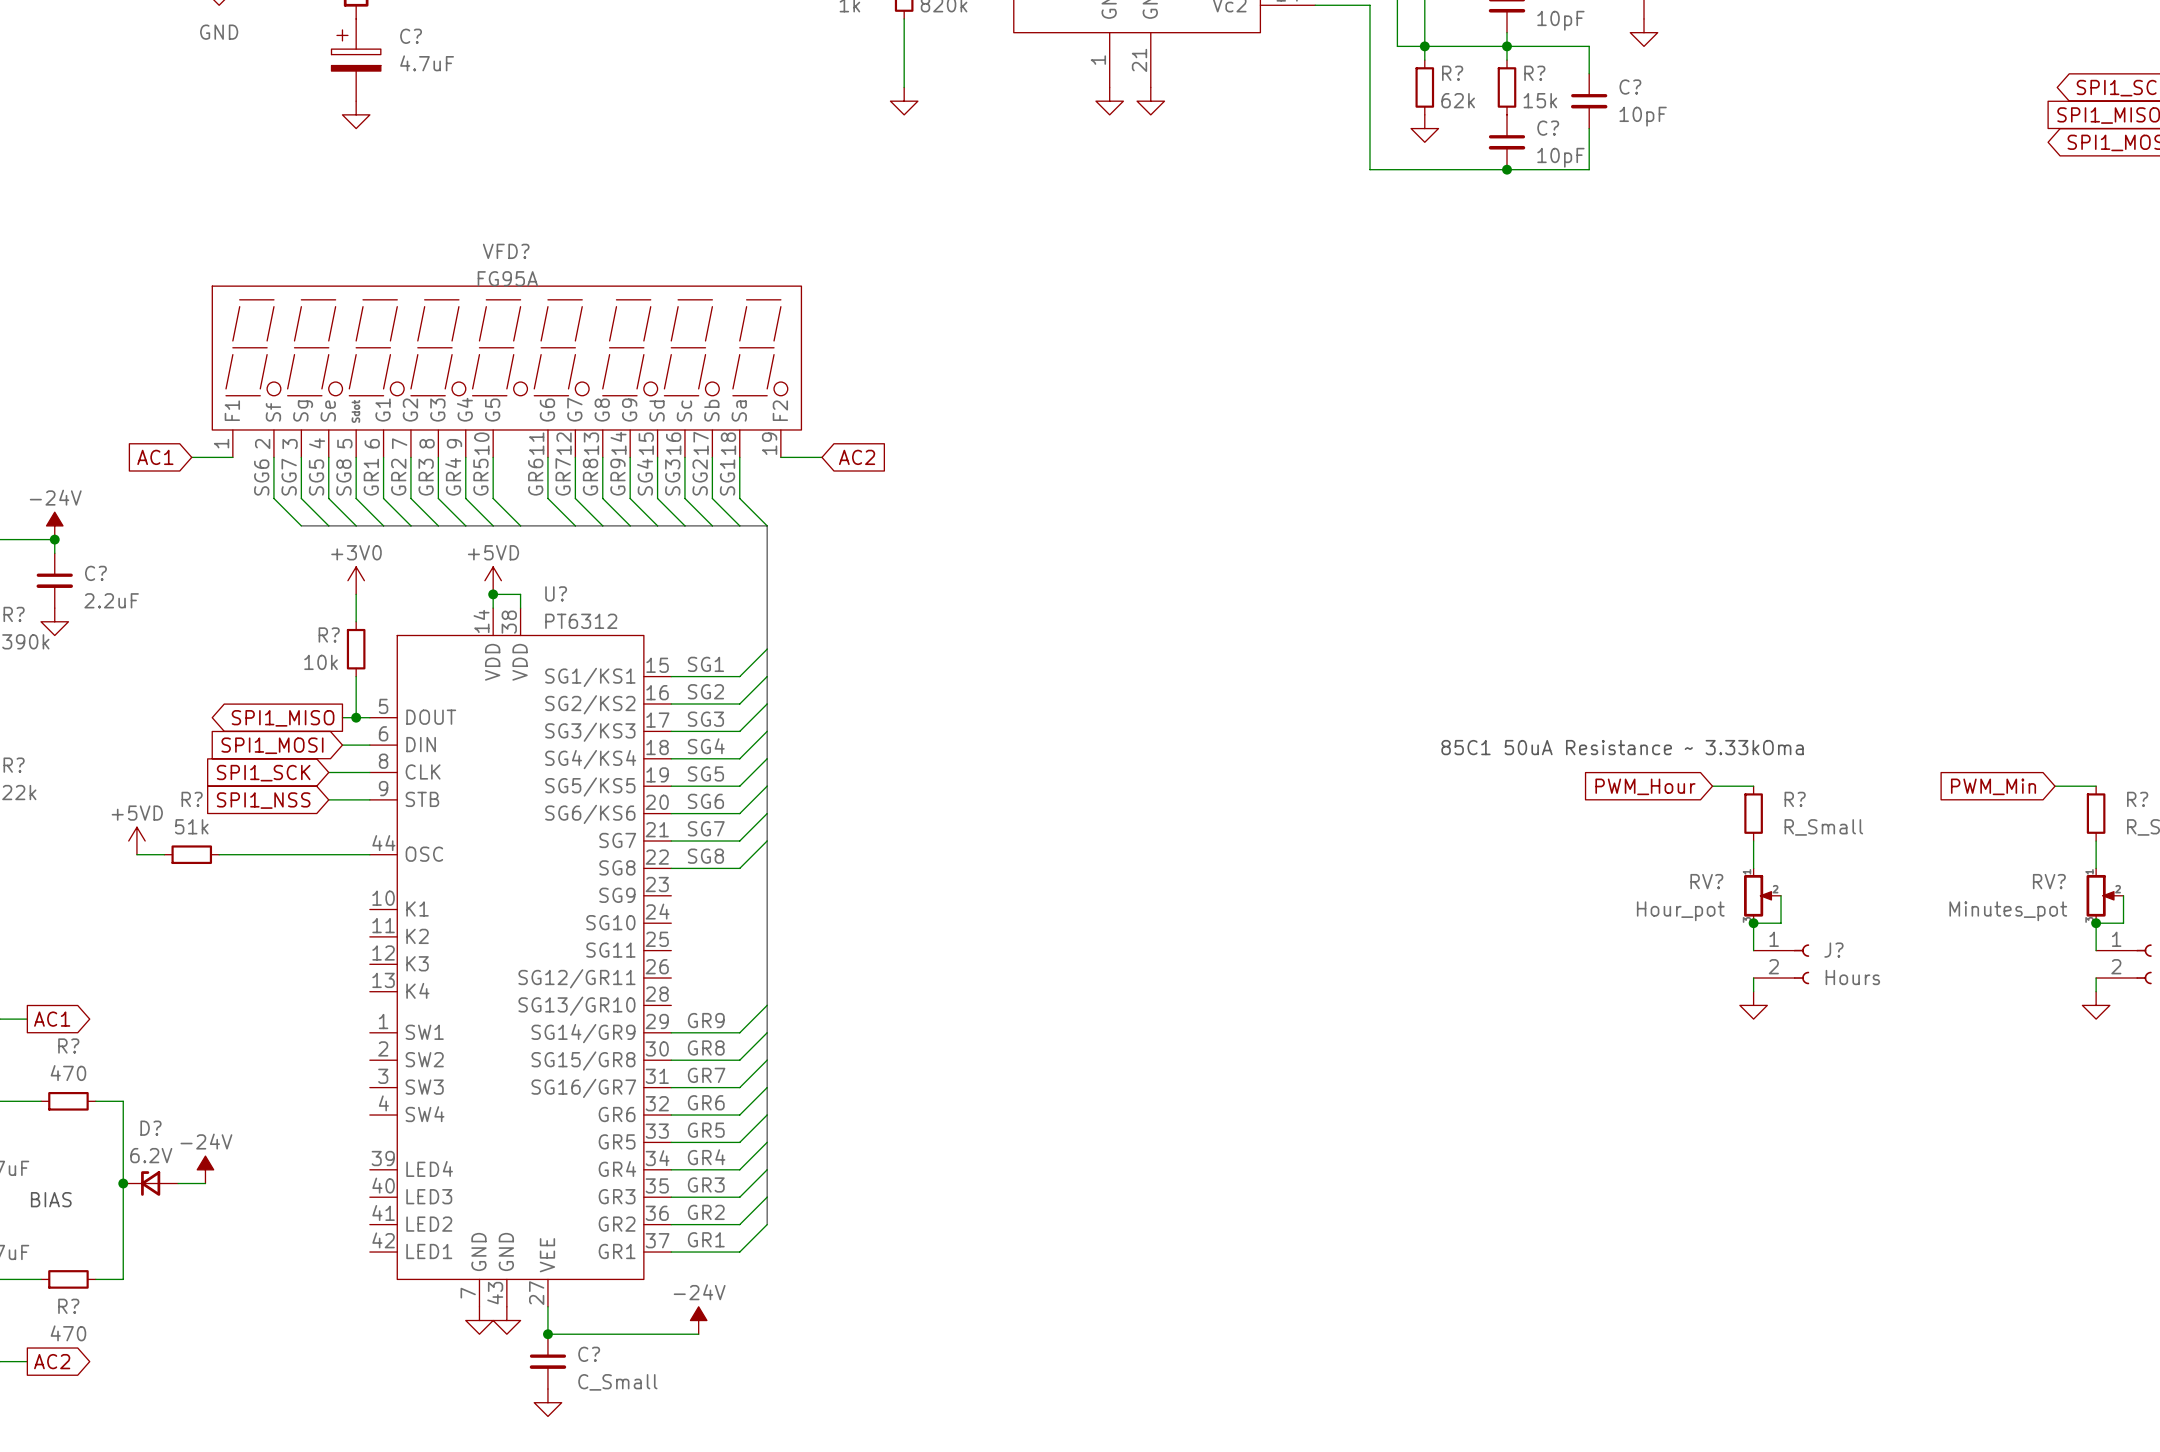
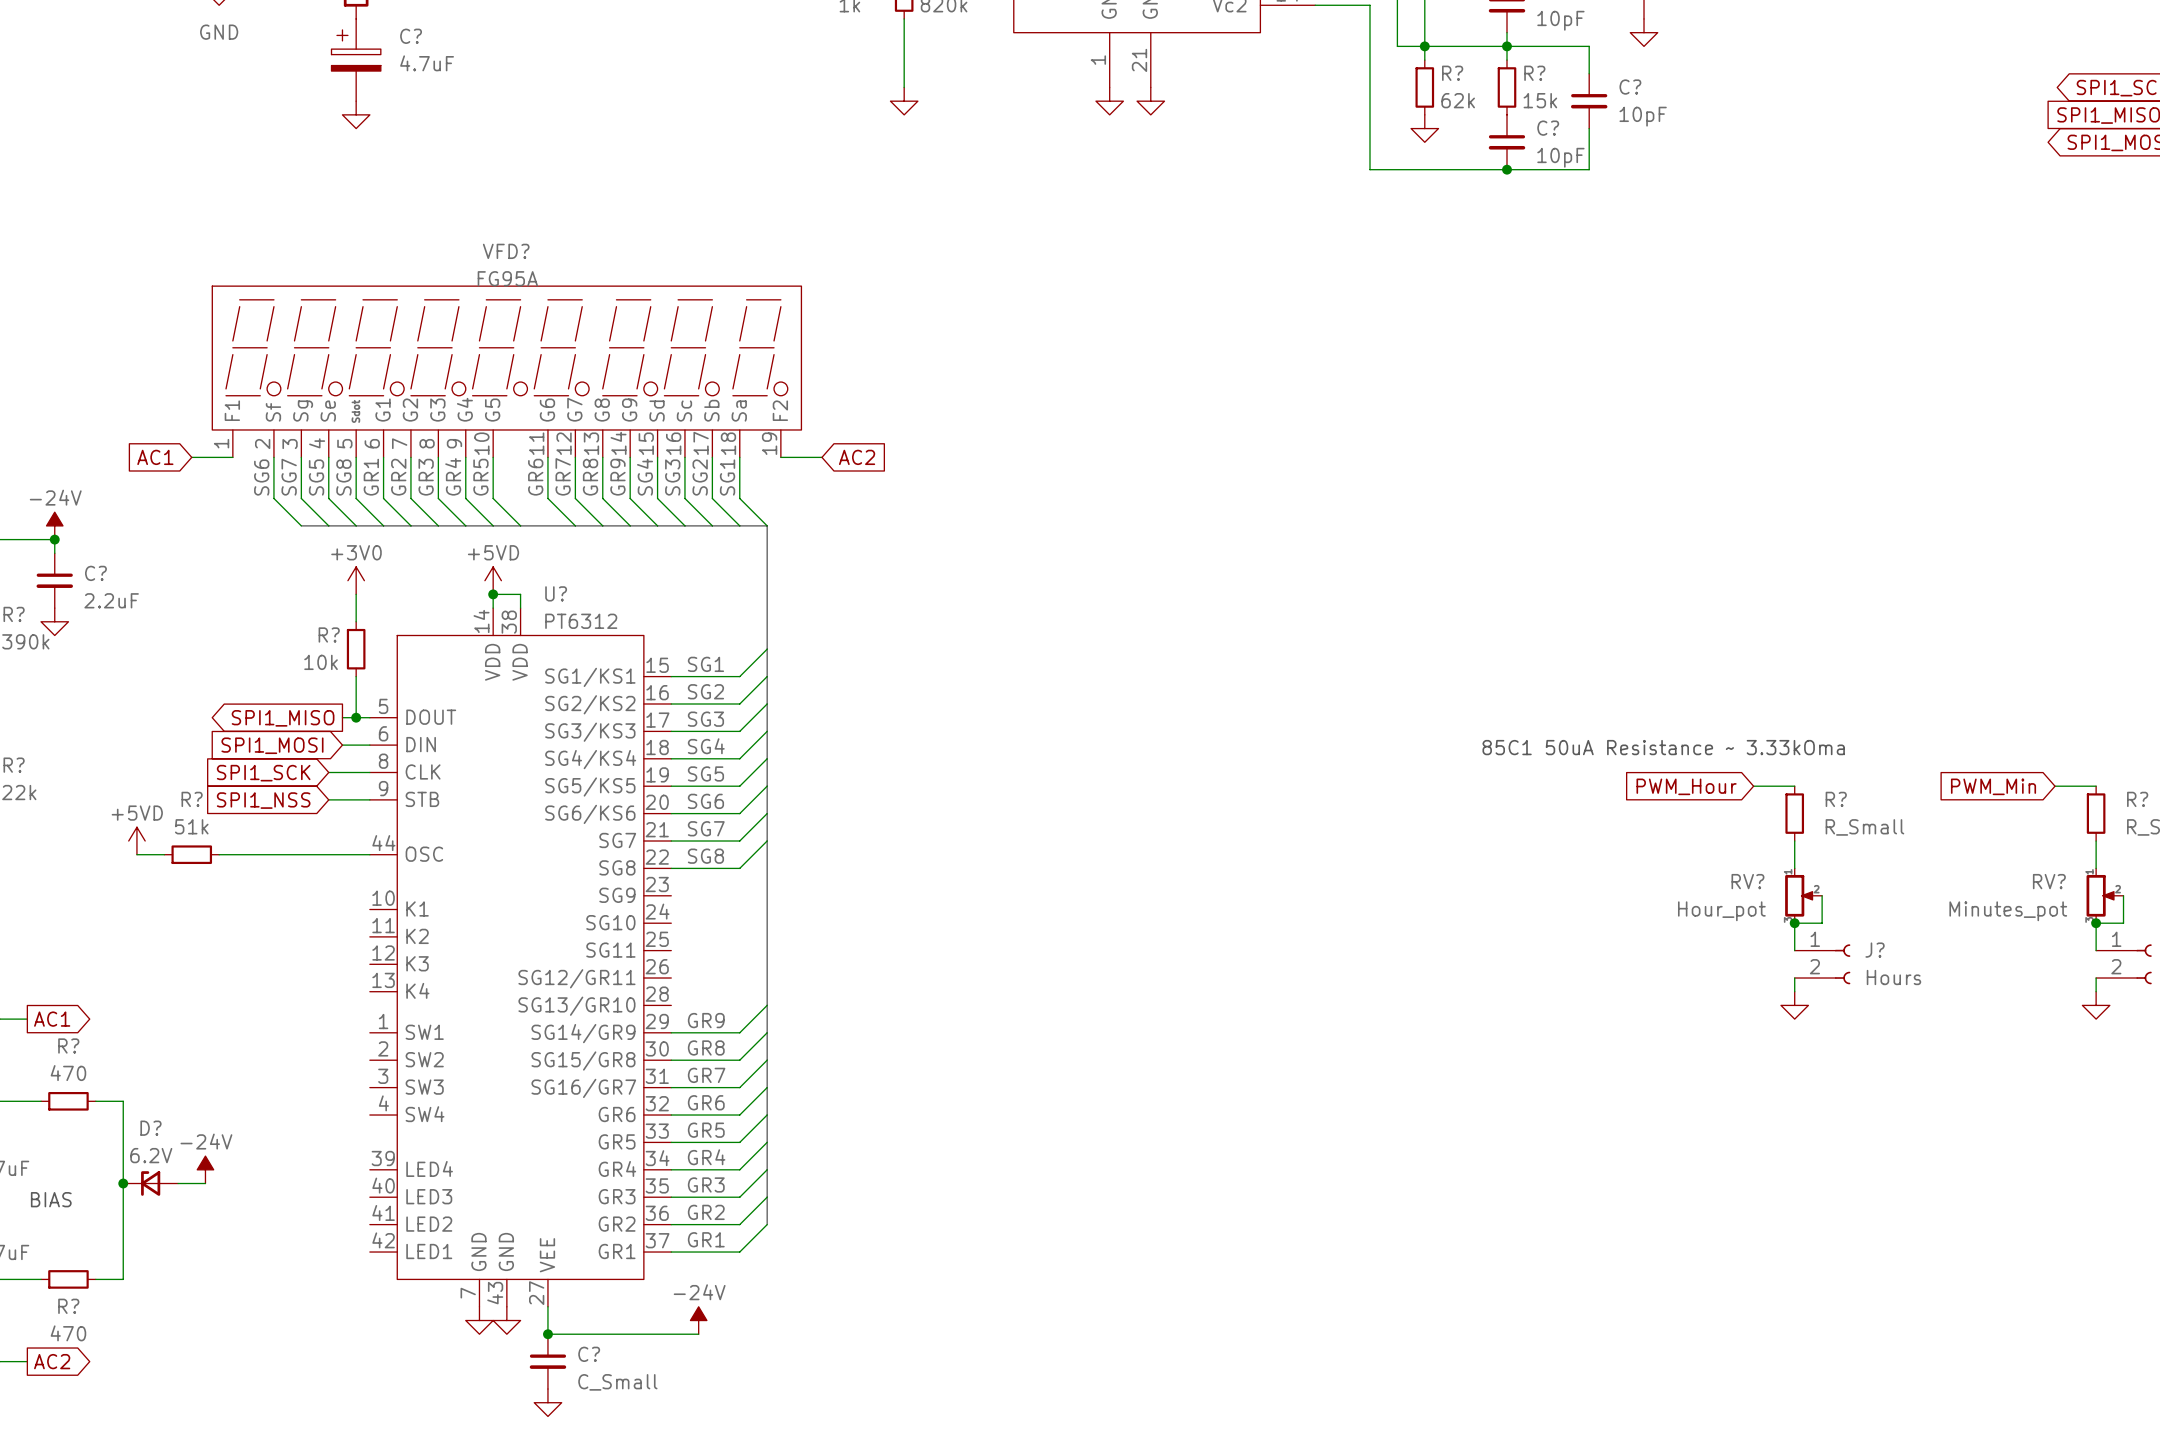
text position: 85C1 50uA Resistance ~ 3.33kOma (1622, 747) -> 85C1 50uA Resistance ~ 3.33kOma (1663, 747)
global label position: PWM_Hour (1645, 786) -> PWM_Hour (1686, 786)
wire: (1712, 786) (1753, 786) -> (1794, 786) (1753, 786)
R? position: (1753, 813) -> (1794, 813)
wire: (1753, 841) (1753, 868) -> (1794, 841) (1794, 868)
RV? position: (1762, 895) -> (1803, 895)
wire: (1781, 895) (1781, 923) (1753, 923) (1753, 950) -> (1822, 895) (1822, 923) (1794, 923) (1794, 950)
junction position: (1753, 923) -> (1794, 923)
J? position: (1781, 964) -> (1822, 964)
wire: (1753, 978) (1753, 991) -> (1794, 978) (1794, 991)
power symbol position: (1753, 1005) -> (1794, 1005)

